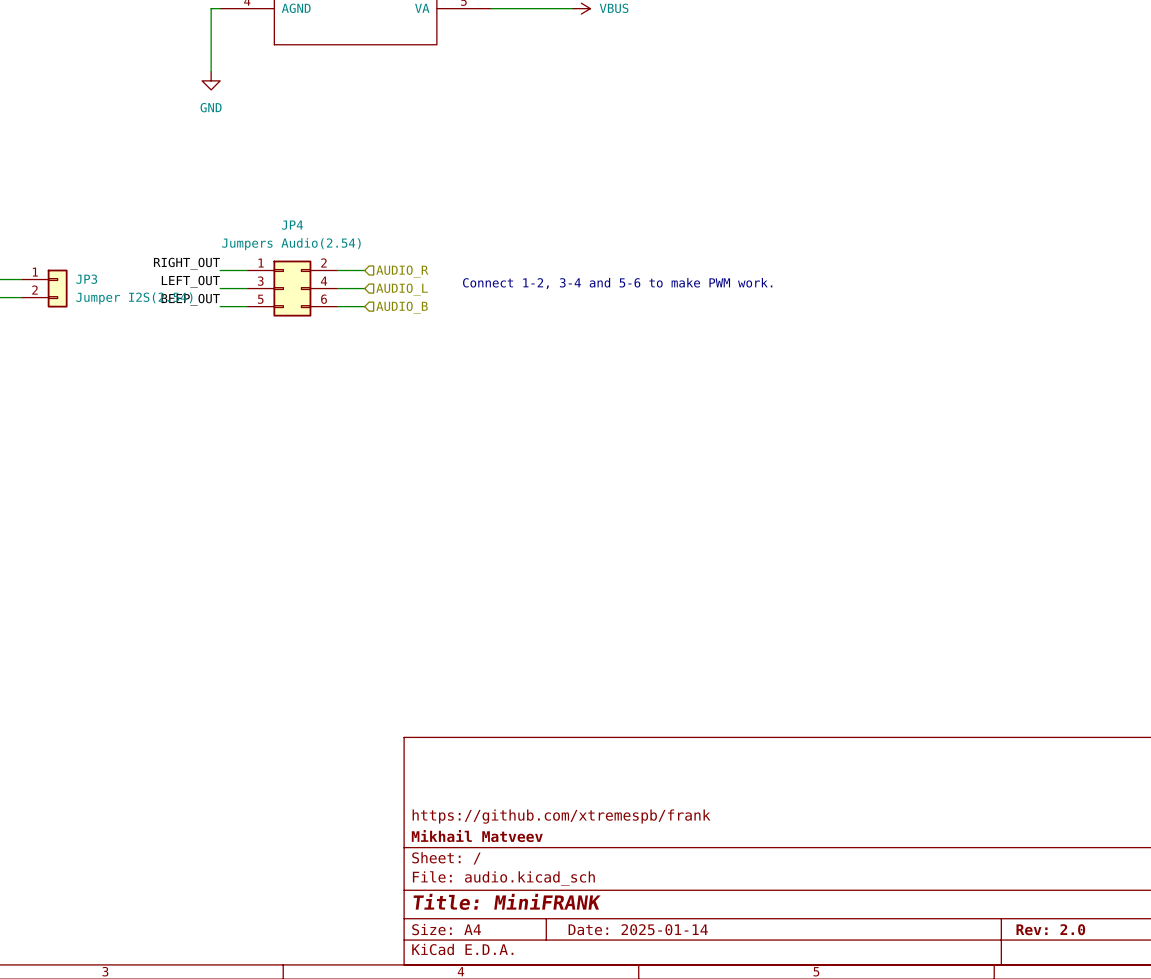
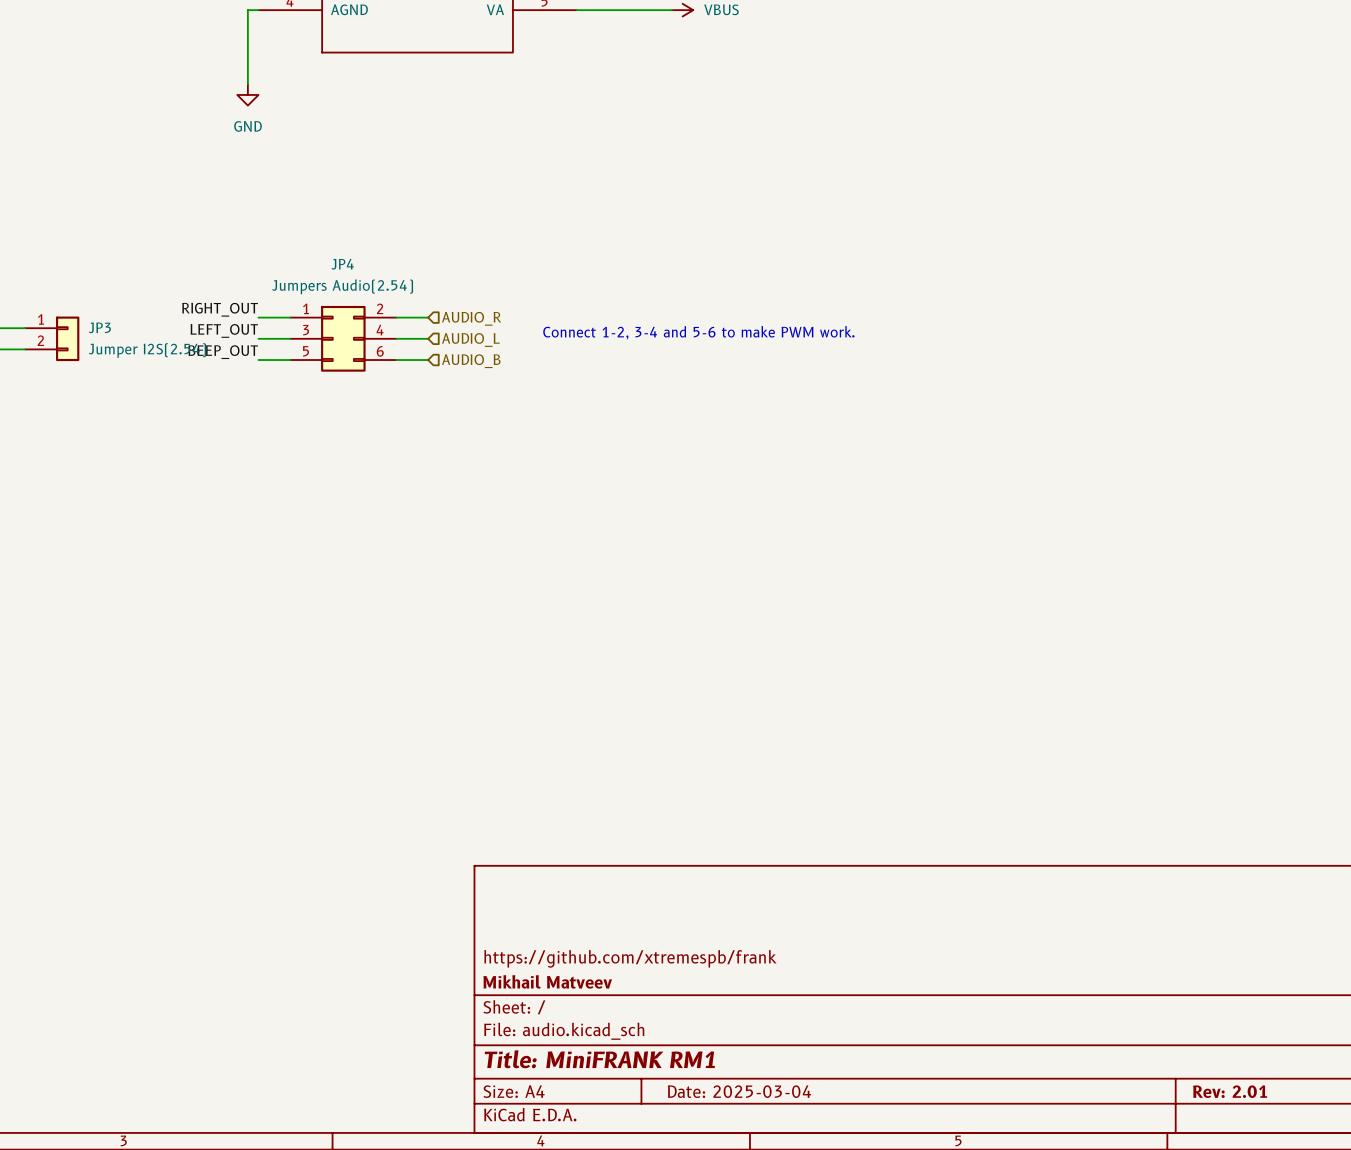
title block: Title: MiniFRANK (507, 901) -> Title: MiniFRANK RM1 (599, 1059)
title block: Date: 2025-01-14 (638, 929) -> Date: 2025-03-04 (739, 1091)
title block: Rev: 2.0 (1050, 929) -> Rev: 2.01 (1230, 1091)

